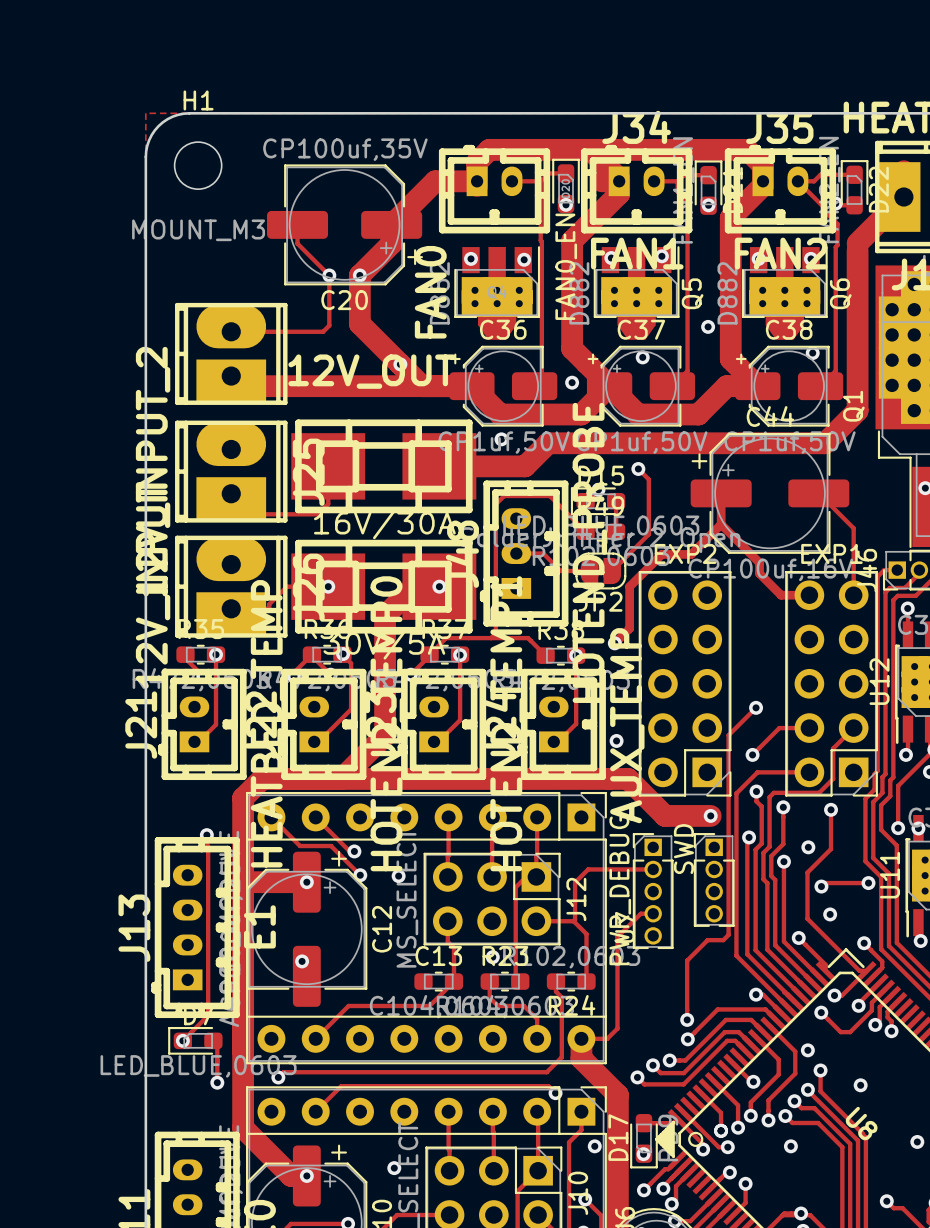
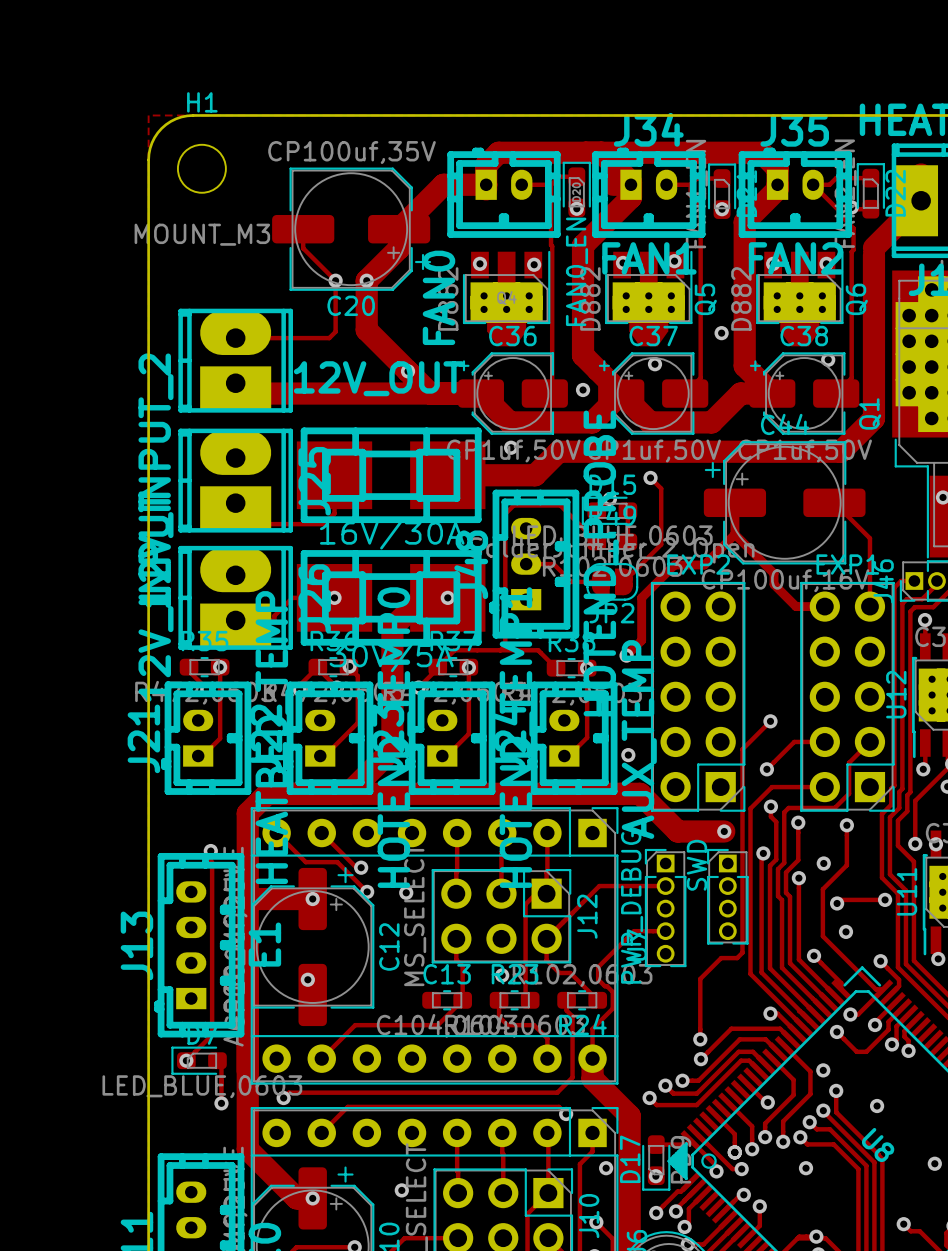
track: (575, 882) (573, 921) -> none
track: (640, 913) (617, 937) (617, 1028) (607, 1038) (581, 1038) -> (653, 931) (634, 931) (598, 967) (598, 979) (612, 991) (612, 1008) (592, 1028) (592, 1058)
track: (536, 921) (573, 921) -> none
track: (573, 921) (586, 934) (586, 981) -> (586, 899) (546, 938) (546, 960) (559, 972) (570, 972) (597, 1000)

